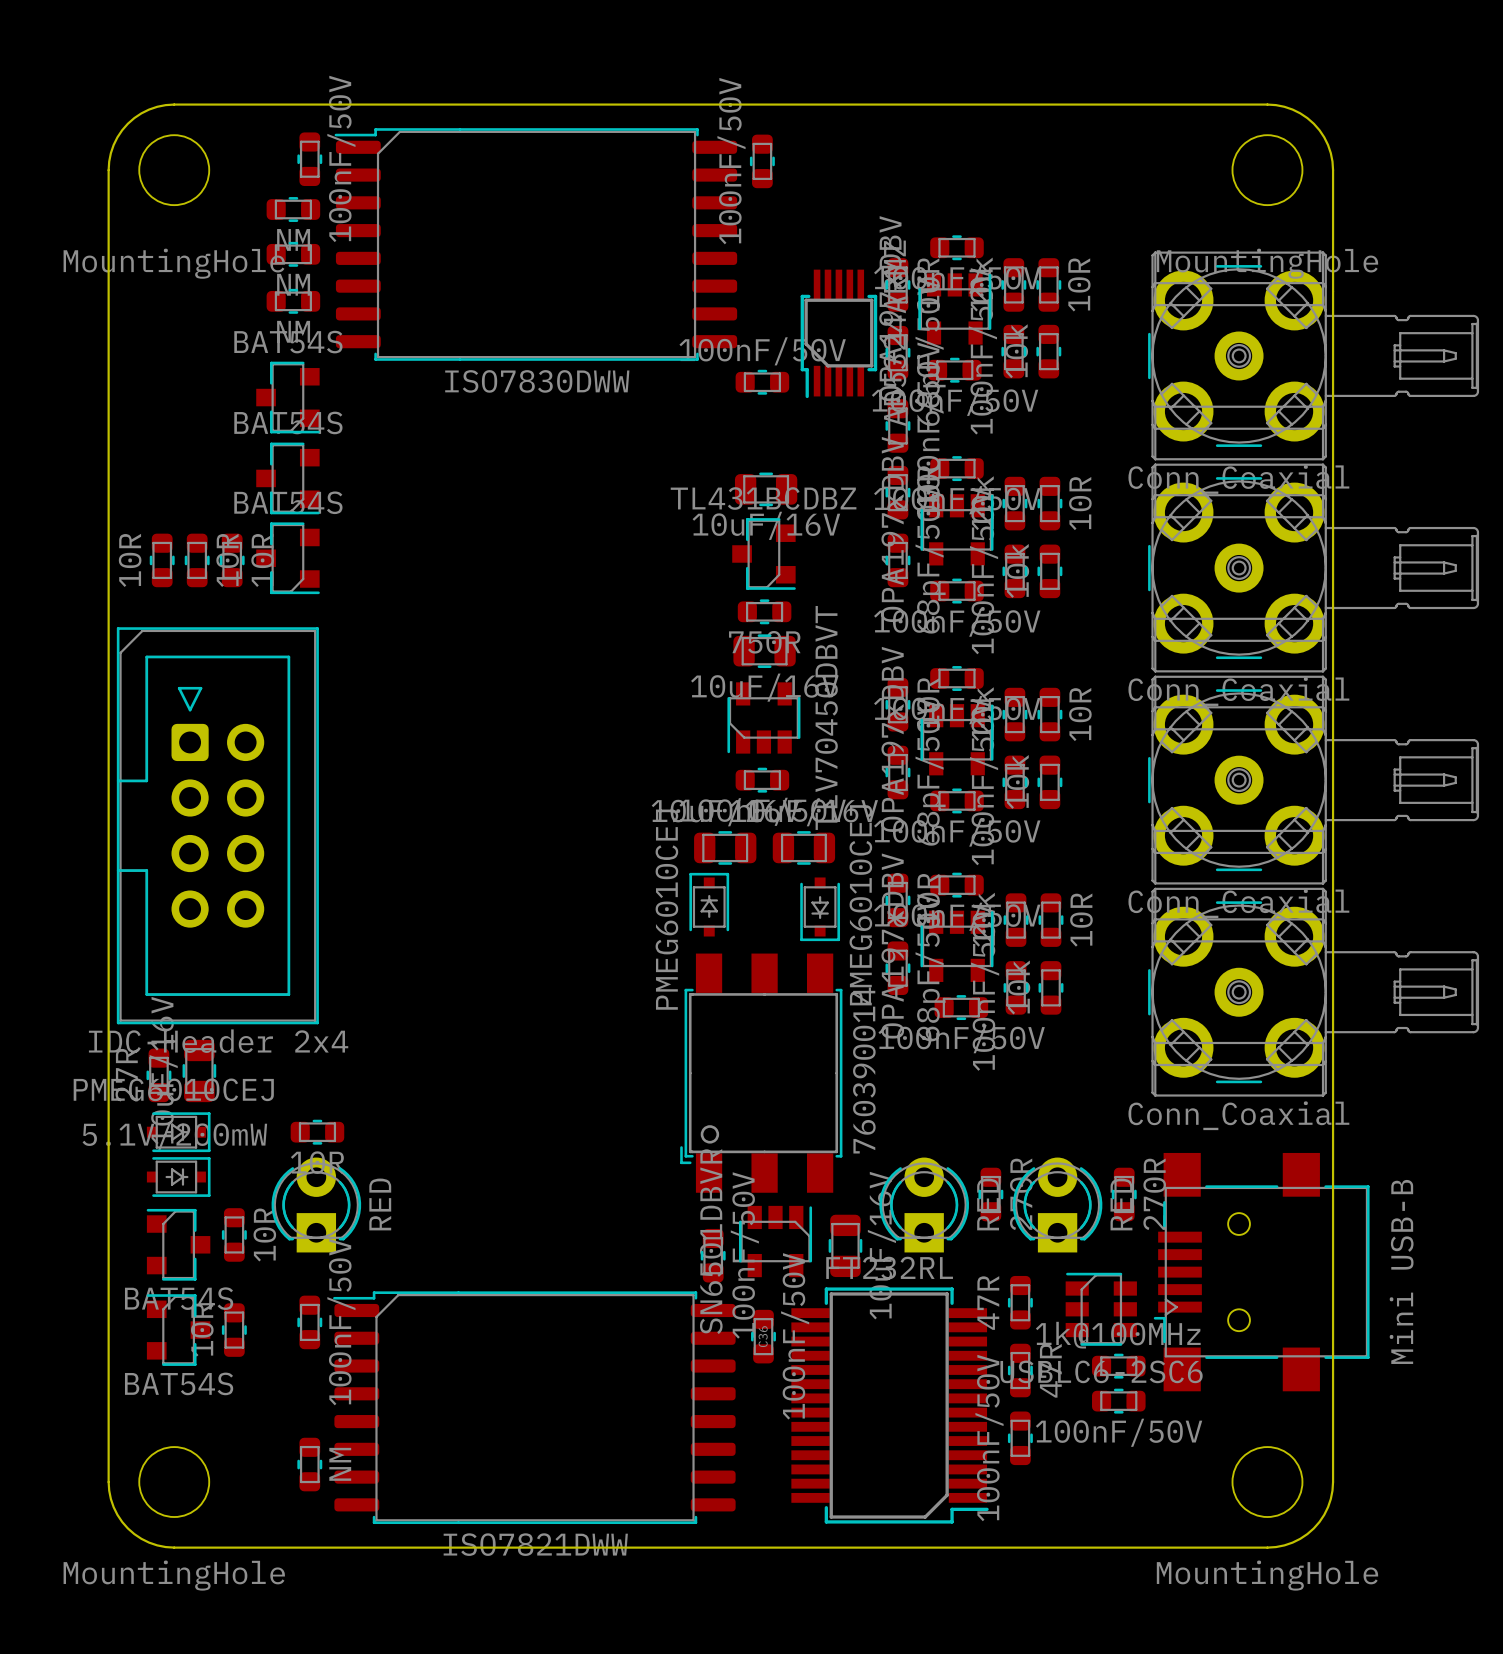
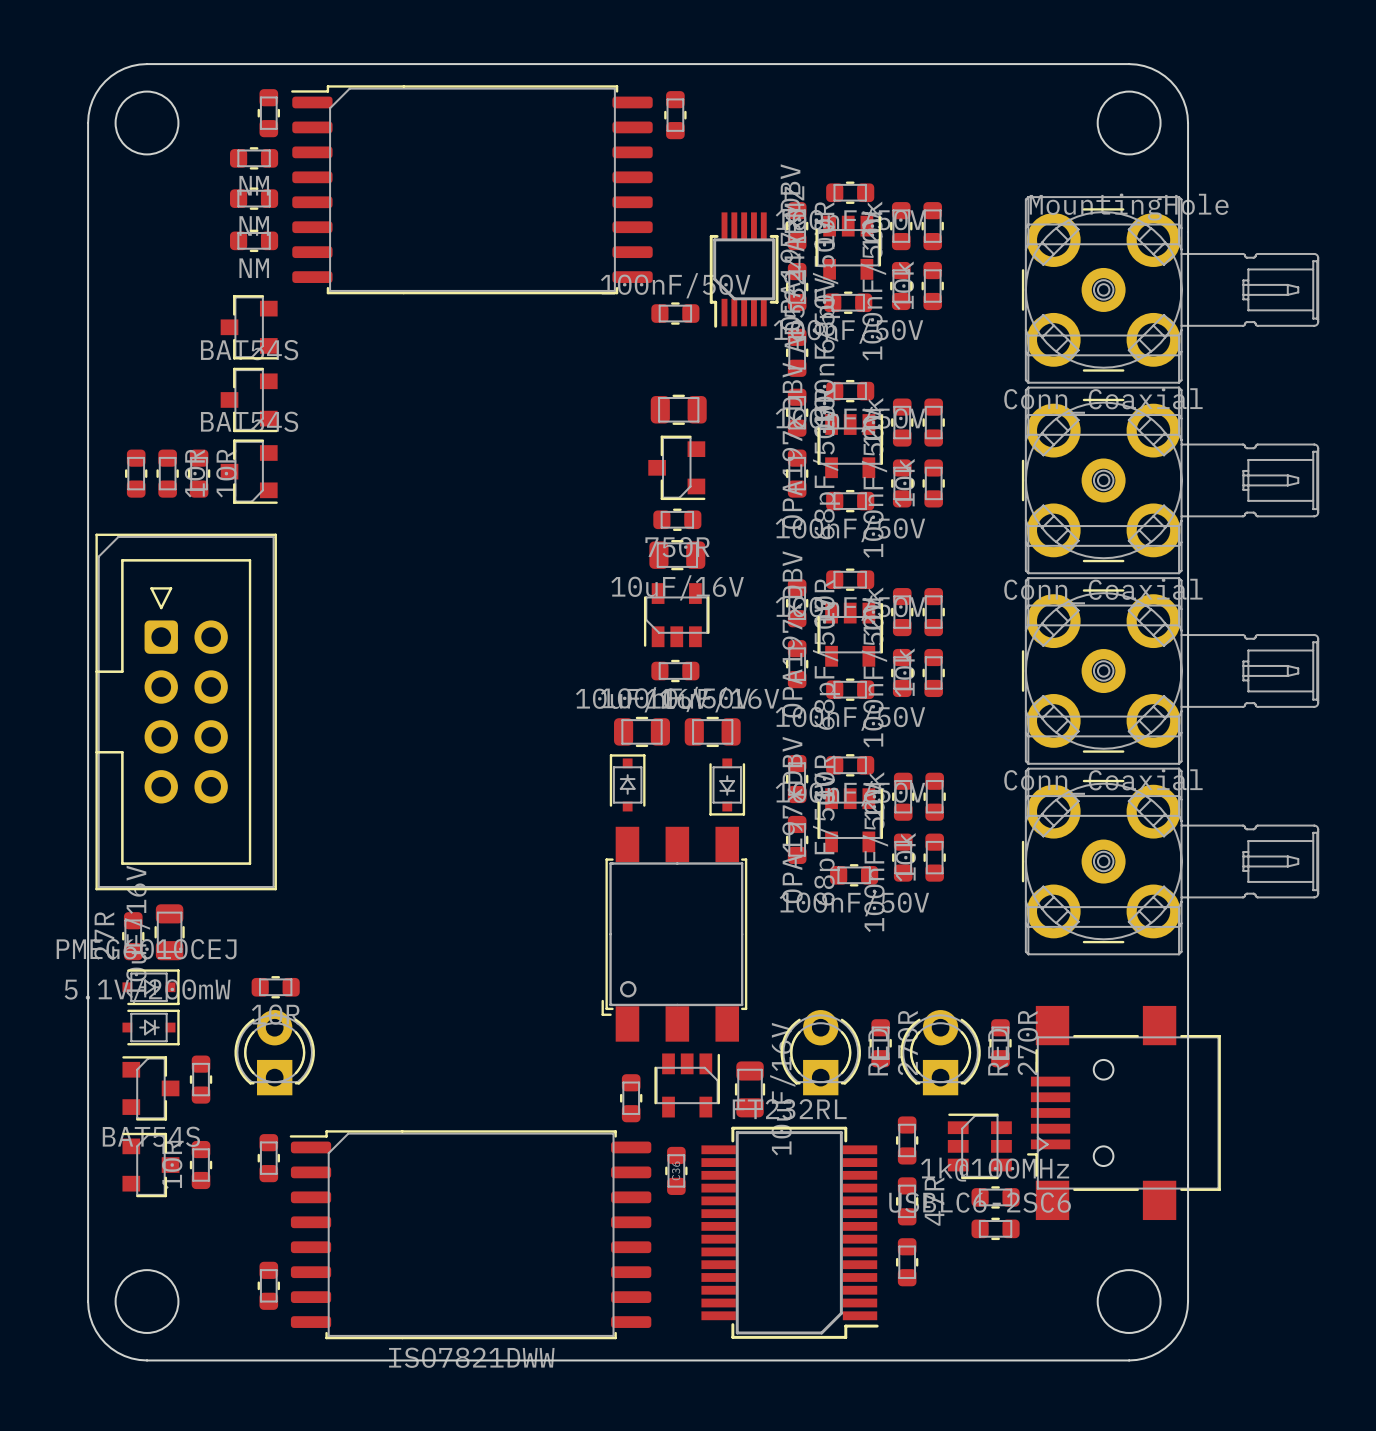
part value: 100nF/50V (341, 158) -> none
part value: 100nF/50V (731, 161) -> none
part value: MountingHole (174, 263) -> none
part value: 10R (1079, 284) -> none
part value: BAT54S (288, 342) -> none
part value: ISO7830DWW (537, 381) -> none
part value: TL431BCDBZ (763, 498) -> none
part value: 10R (1080, 503) -> none
part value: 10uF/16V (766, 525) -> none
part value: 10R (130, 560) -> none
part value: 10R (1080, 714) -> none
part value: TLV70450DBVT (826, 717) -> none
part value: PMEG6010CEJ (860, 905) -> none
part value: PMEG6010CEJ (666, 909) -> none
part value: 10R (1081, 920) -> none
part value: IDC-Header 2x4 (218, 1041) -> none
part value: 760390014 (864, 1070) -> none
part value: Conn_Coaxial (1238, 1115) -> none
part value: RED (380, 1204) -> none
part value: 10R (264, 1234) -> none
part value: SN6501DBVR (711, 1241) -> none
part value: 100nF/50V (744, 1255) -> none
part value: Mini USB-B (1401, 1271) -> none
part value: 47R (988, 1303) -> none
part value: 100nF/50V (341, 1322) -> none
C36 value: 100nF/50V (795, 1336) -> none
part value: BAT54S (179, 1383) -> none
part value: 100nF/50V (1119, 1432) -> none
part value: 100nF/50V (989, 1438) -> none
part value: NM (340, 1464) -> none
part value: MountingHole (174, 1575) -> none
part value: MountingHole (1267, 1575) -> none

